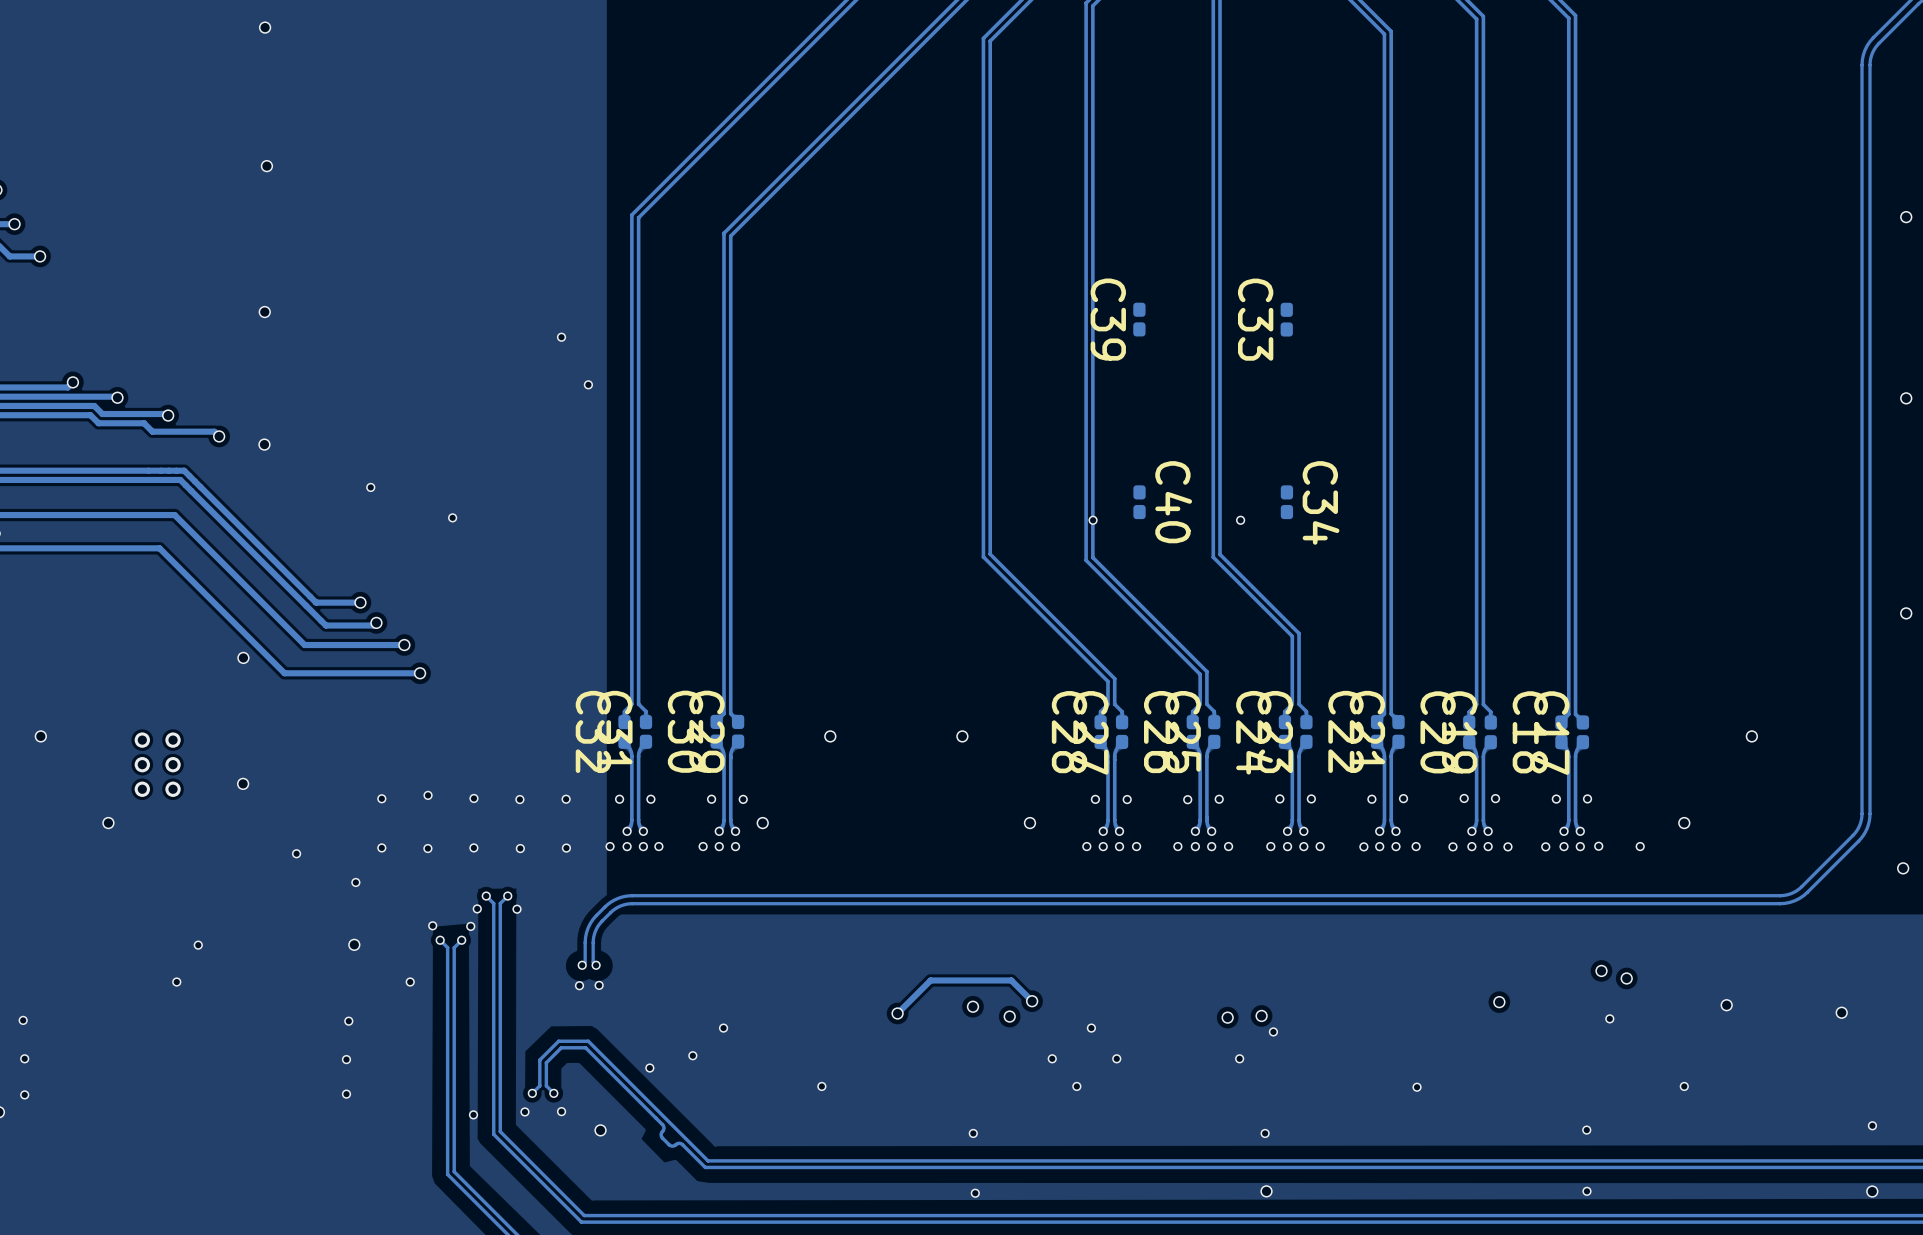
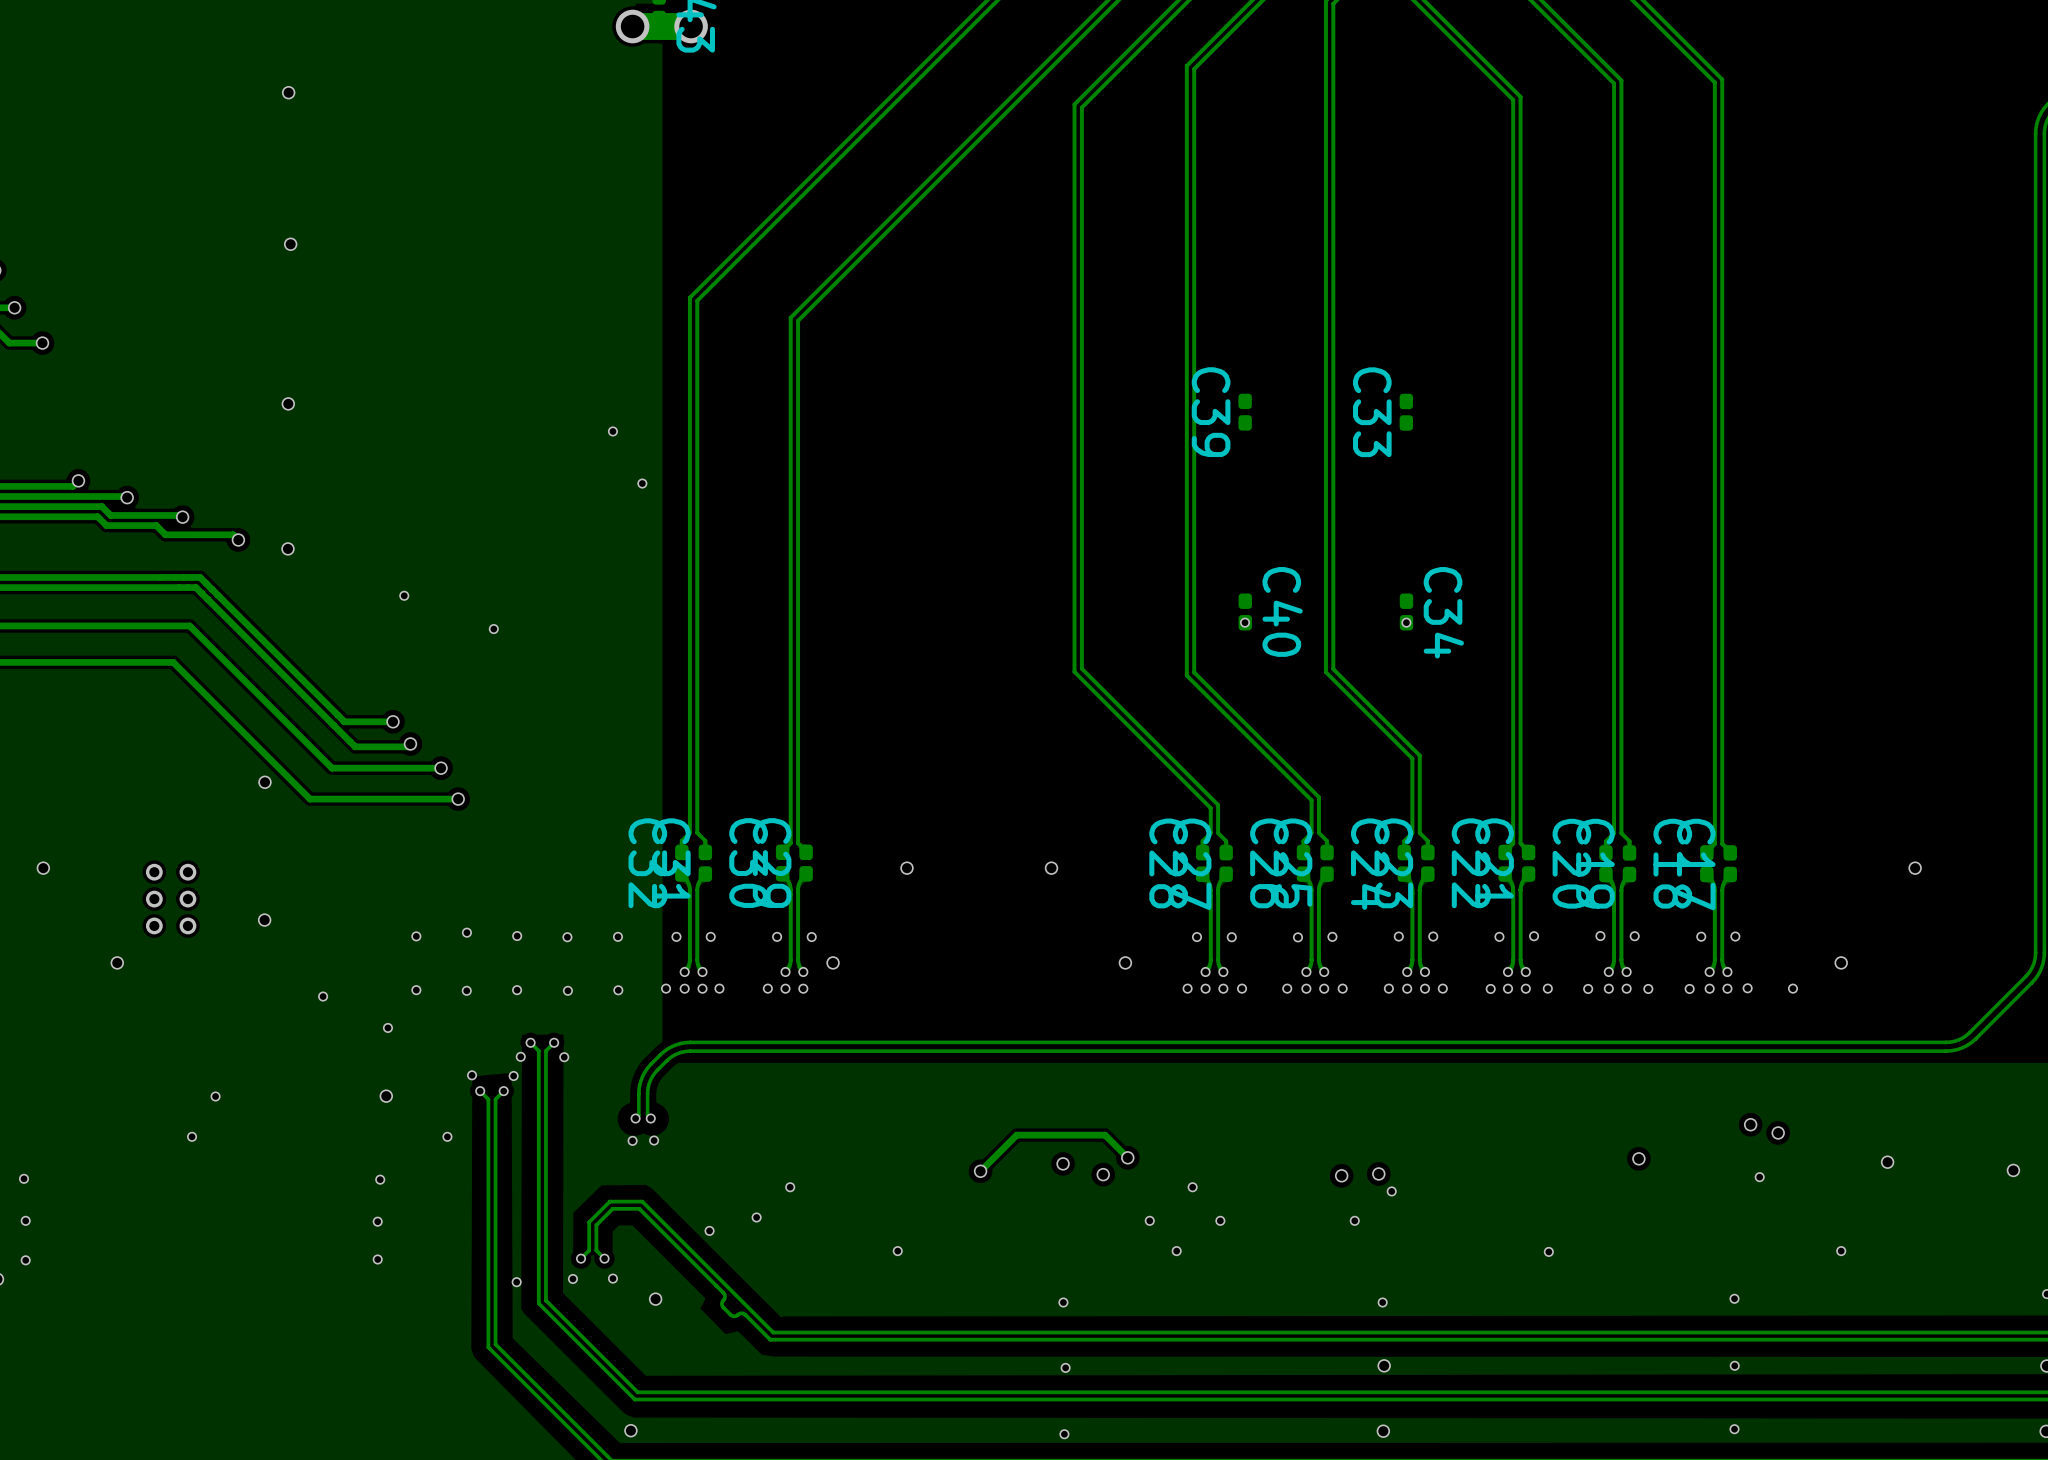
via position: (1093, 520) -> (1245, 622)
via position: (1240, 520) -> (1406, 622)

